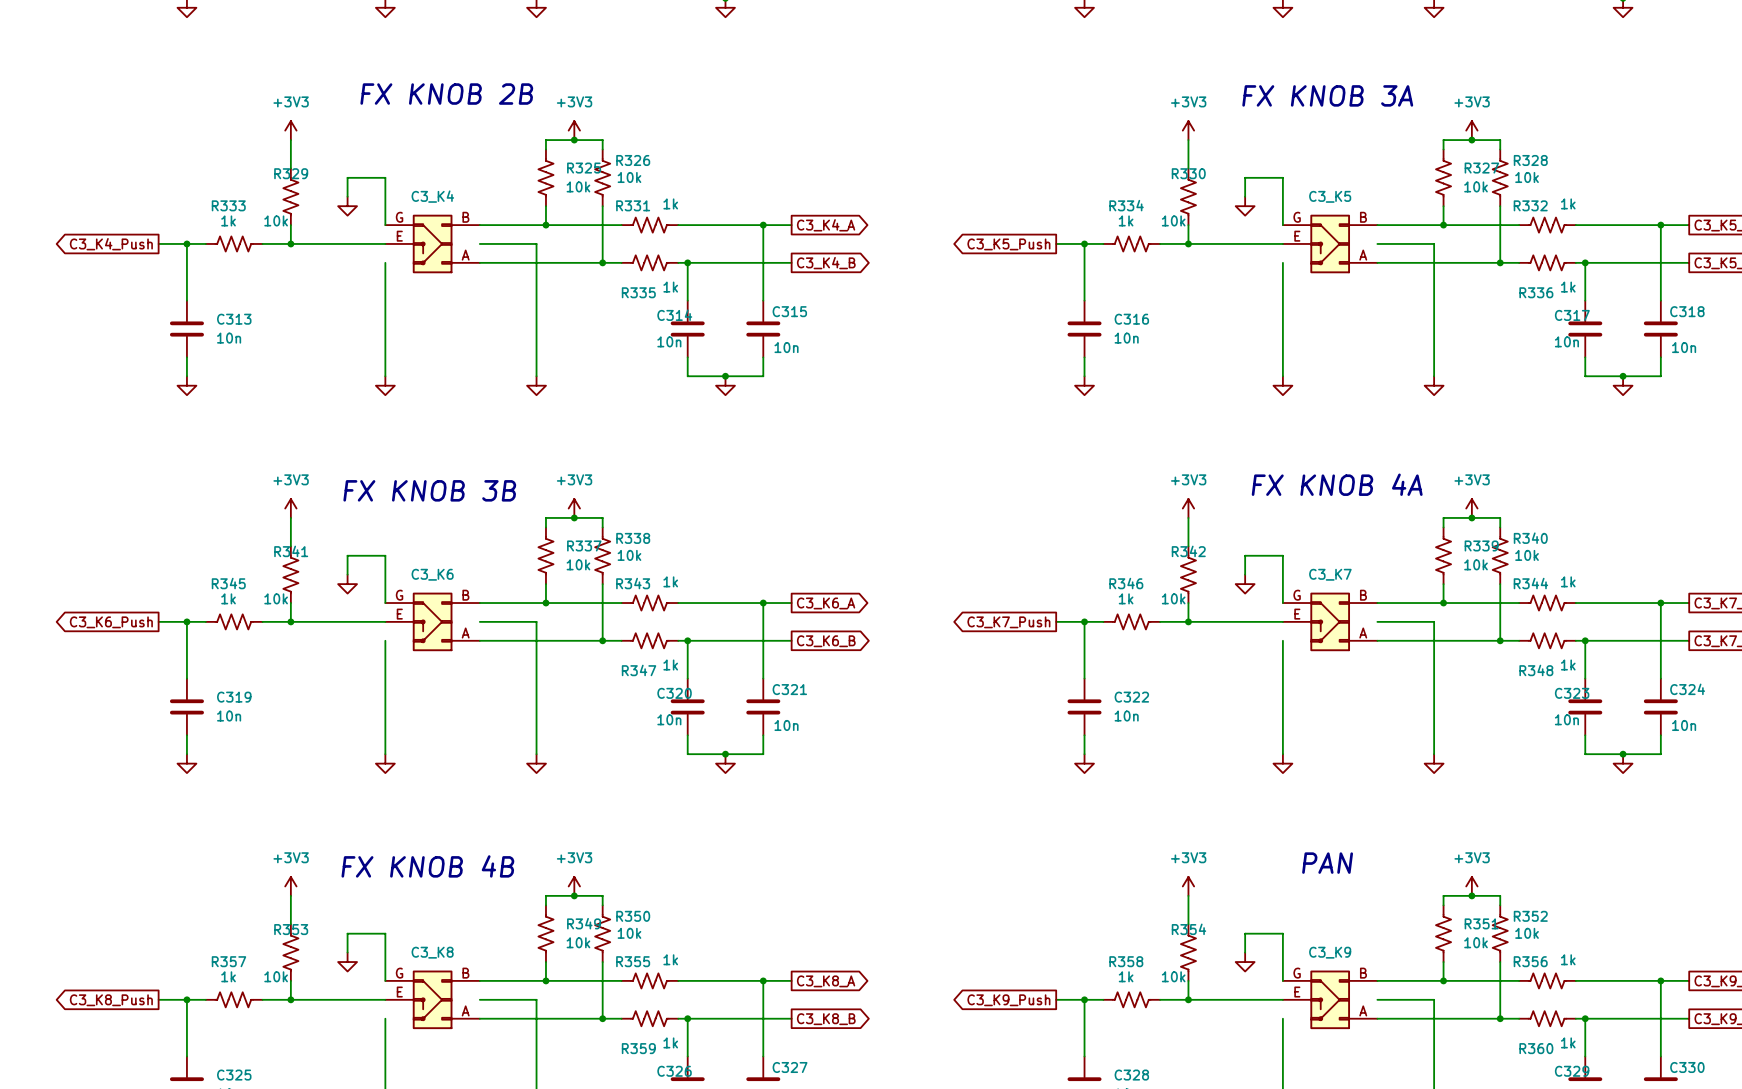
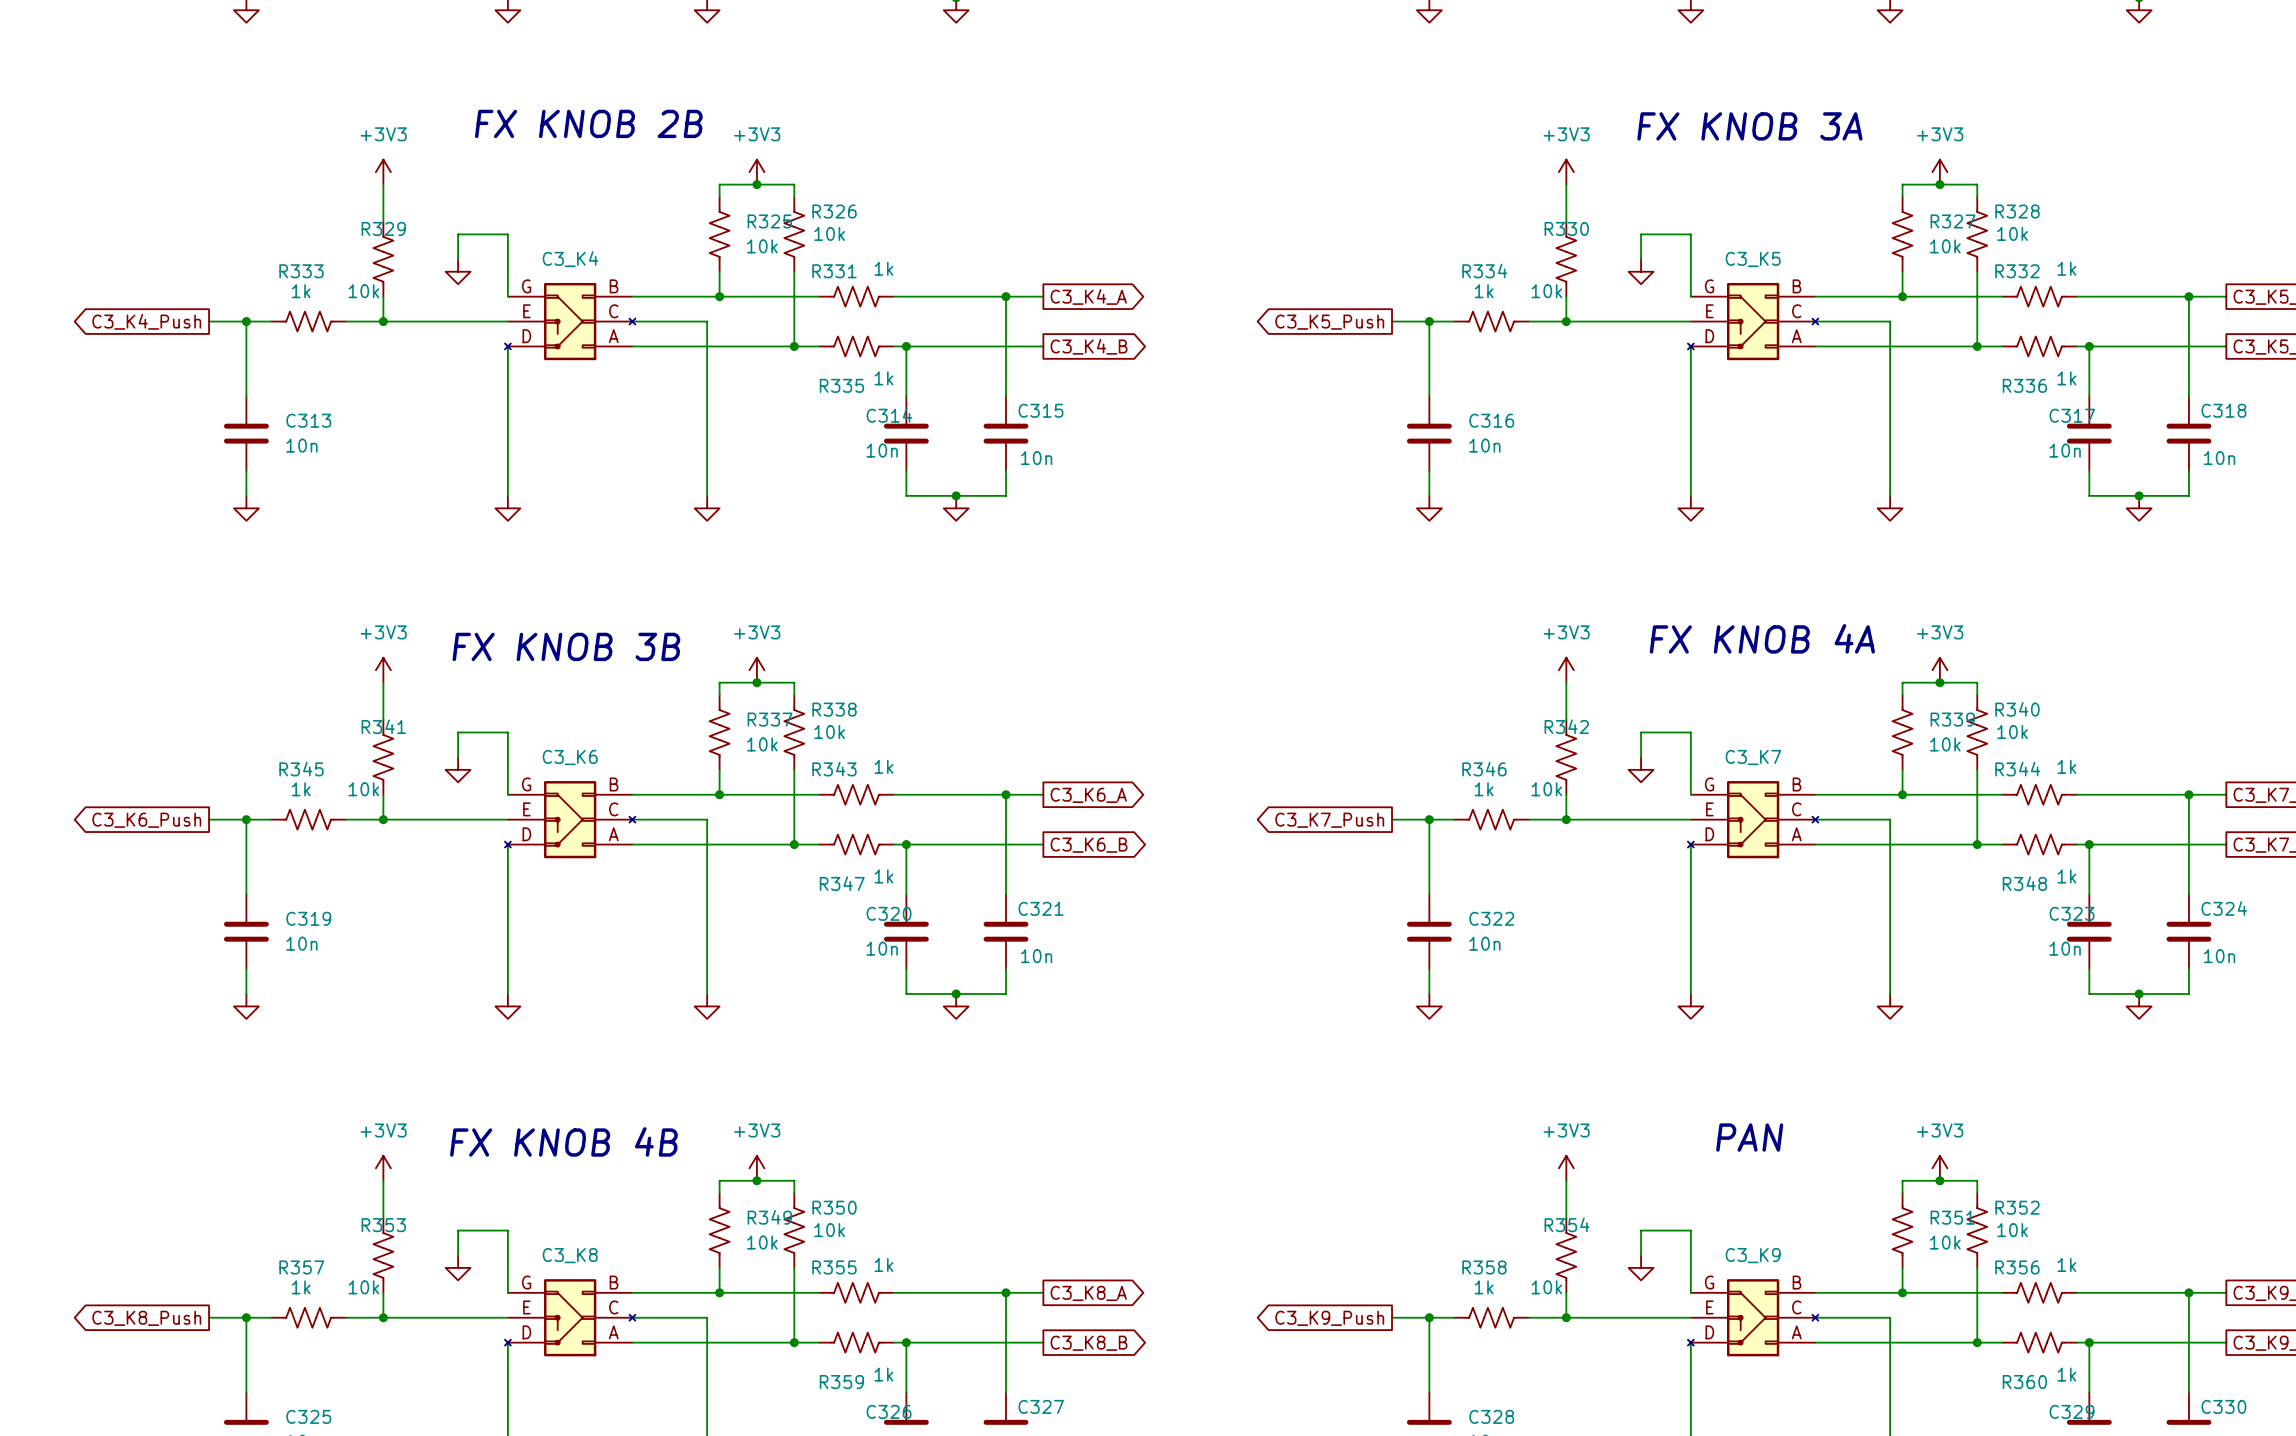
part symbol: [385, 214, 480, 274] -> [504, 282, 636, 361]
part symbol: [1282, 214, 1378, 274] -> [1687, 282, 1819, 361]
part symbol: [385, 592, 480, 652] -> [504, 781, 636, 859]
part symbol: [1282, 592, 1378, 652] -> [1687, 781, 1819, 859]
part symbol: [385, 970, 480, 1030] -> [504, 1279, 636, 1357]
part symbol: [1282, 970, 1378, 1030] -> [1687, 1279, 1819, 1357]

